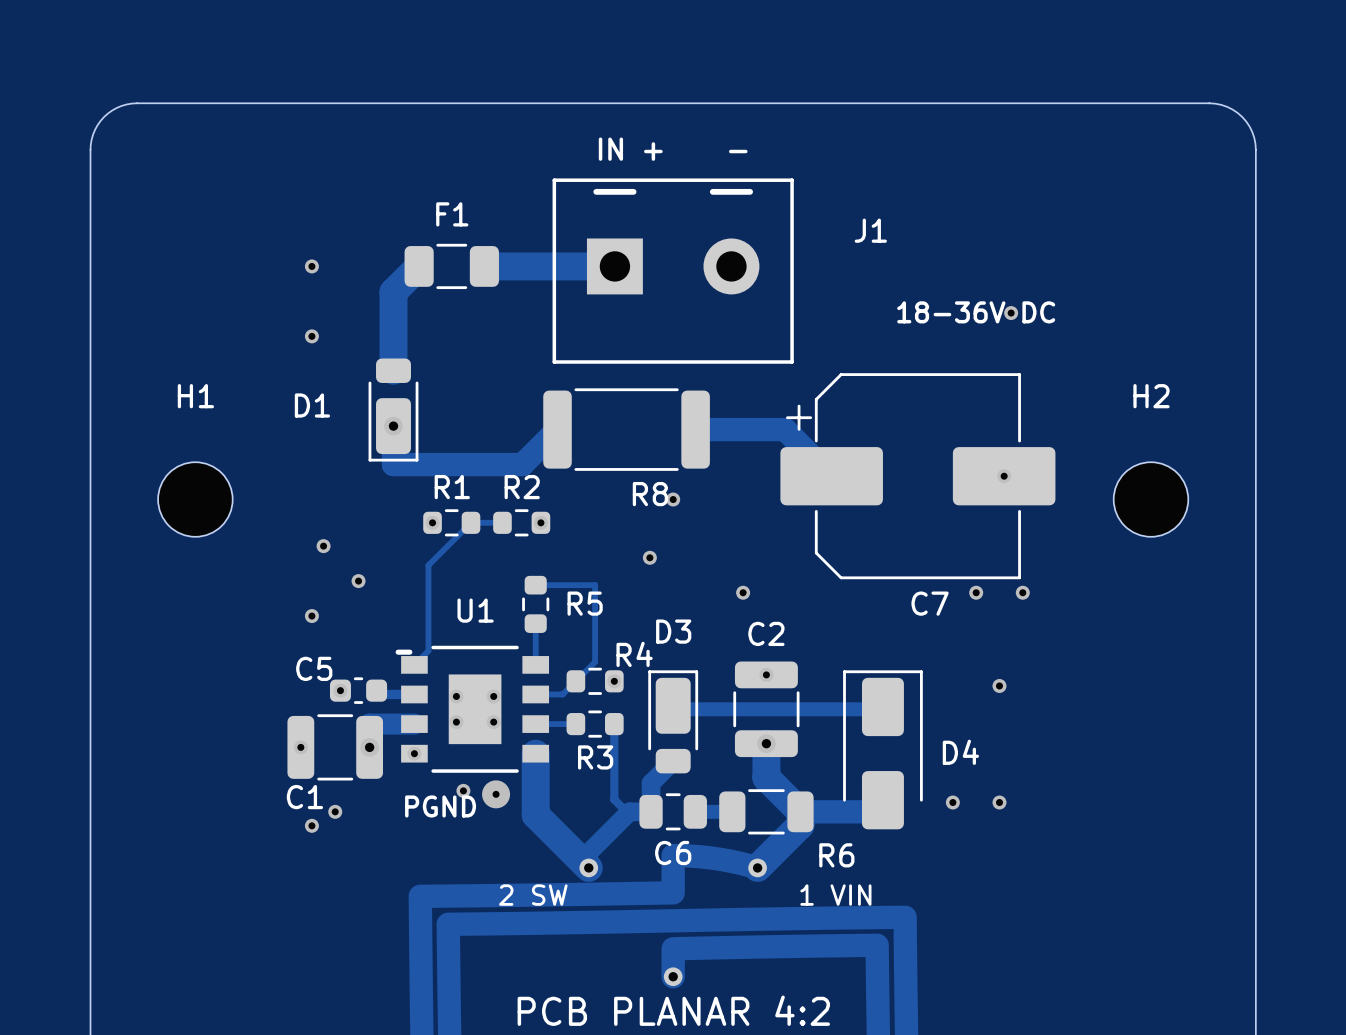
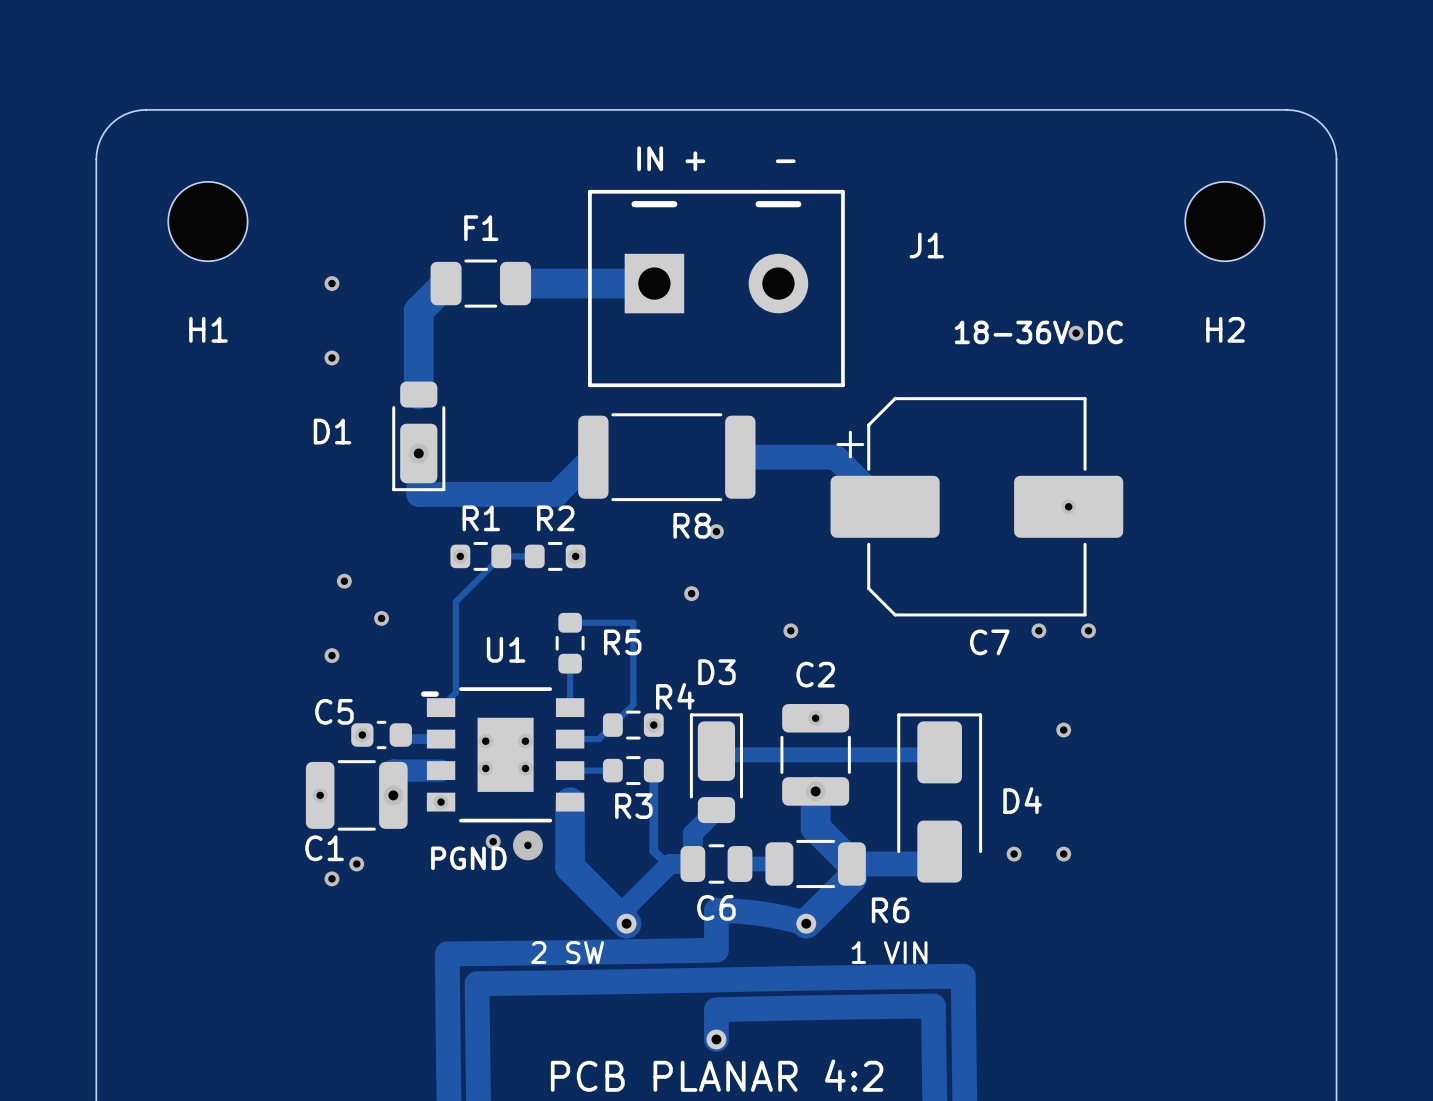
H1 name position: H1 (195, 396) -> H1 (208, 329)
H2 name position: H2 (1151, 396) -> H2 (1225, 329)
H1 position: (195, 499) -> (207, 221)
H2 position: (1150, 499) -> (1224, 221)

